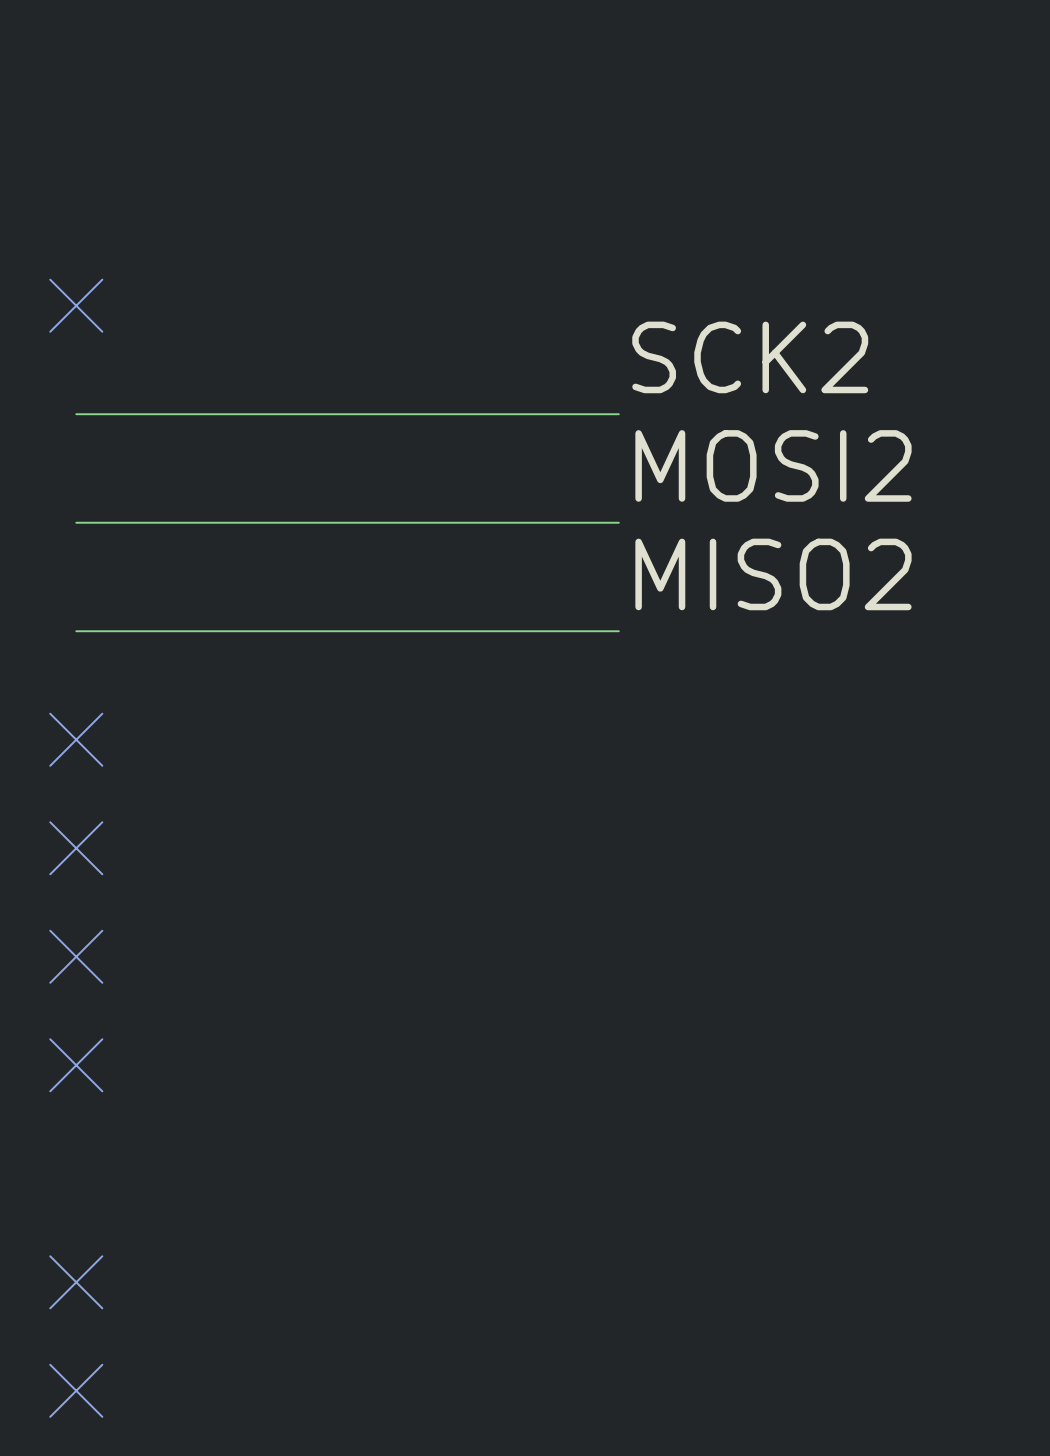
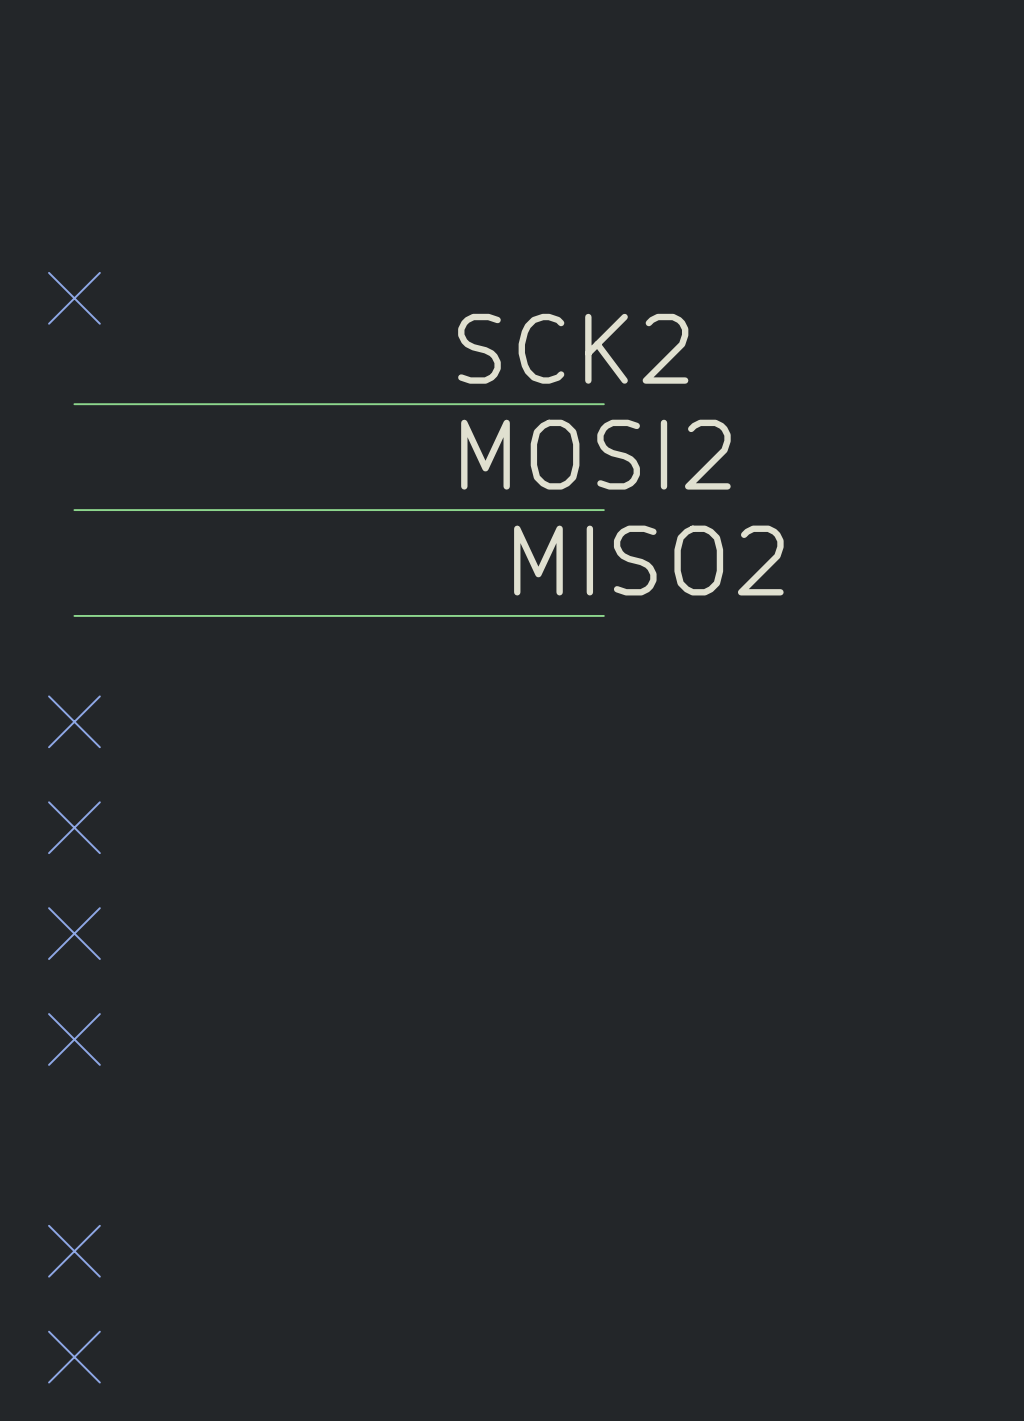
label position: SCK2 (750, 357) -> SCK2 (573, 348)
label position: MOSI2 (773, 465) -> MOSI2 (595, 454)
label position: MISO2 (773, 574) -> MISO2 (648, 560)

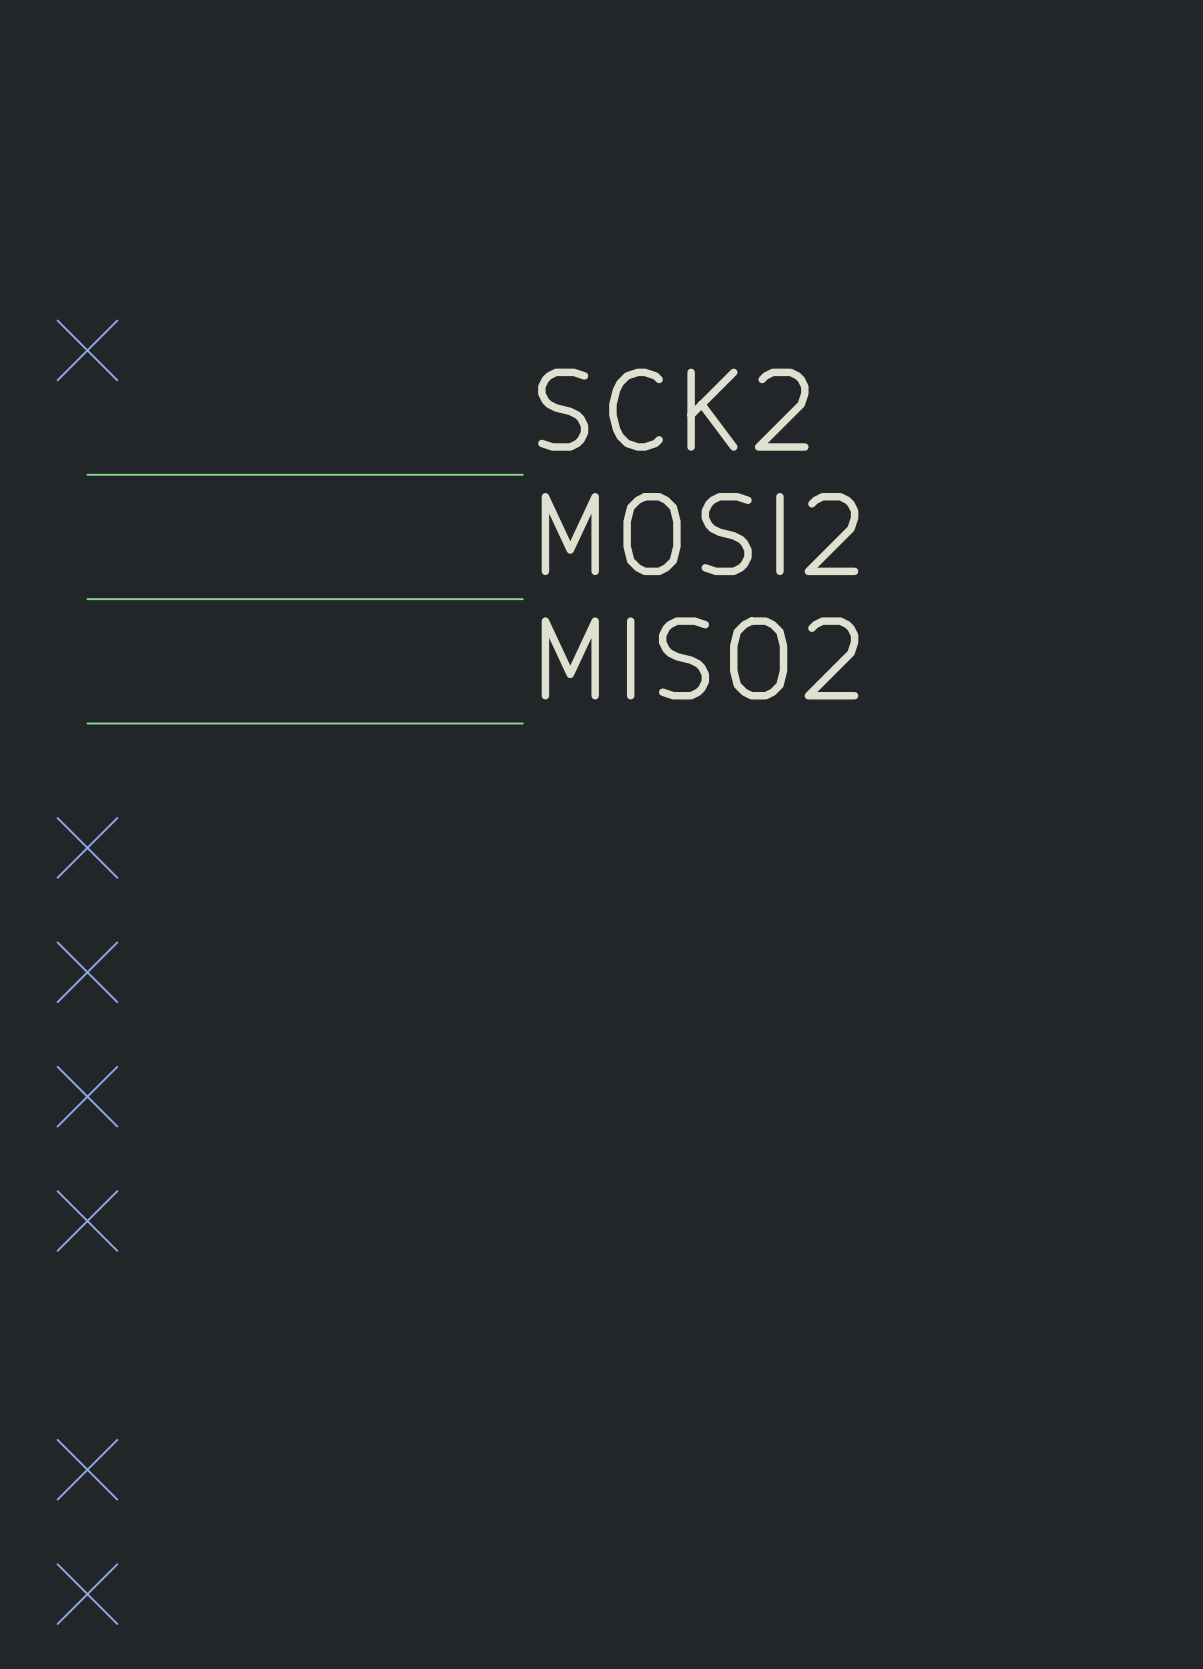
wire: (445, 404) (603, 404) -> none
wire: (445, 510) (603, 510) -> none
label position: MISO2 (648, 560) -> MISO2 (699, 658)
wire: (445, 615) (603, 615) -> none

